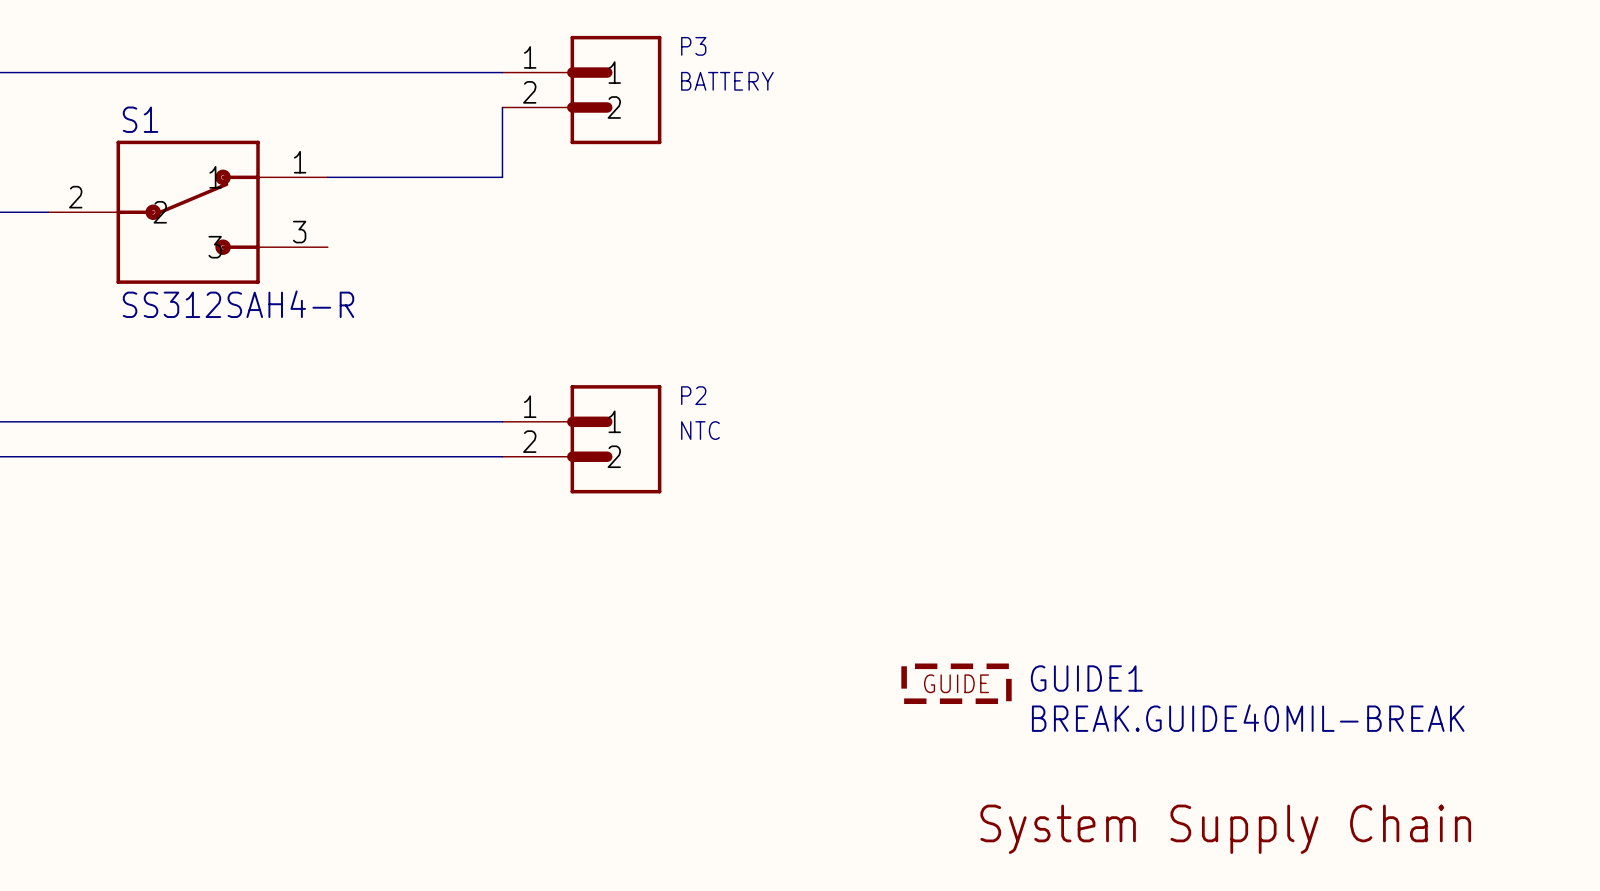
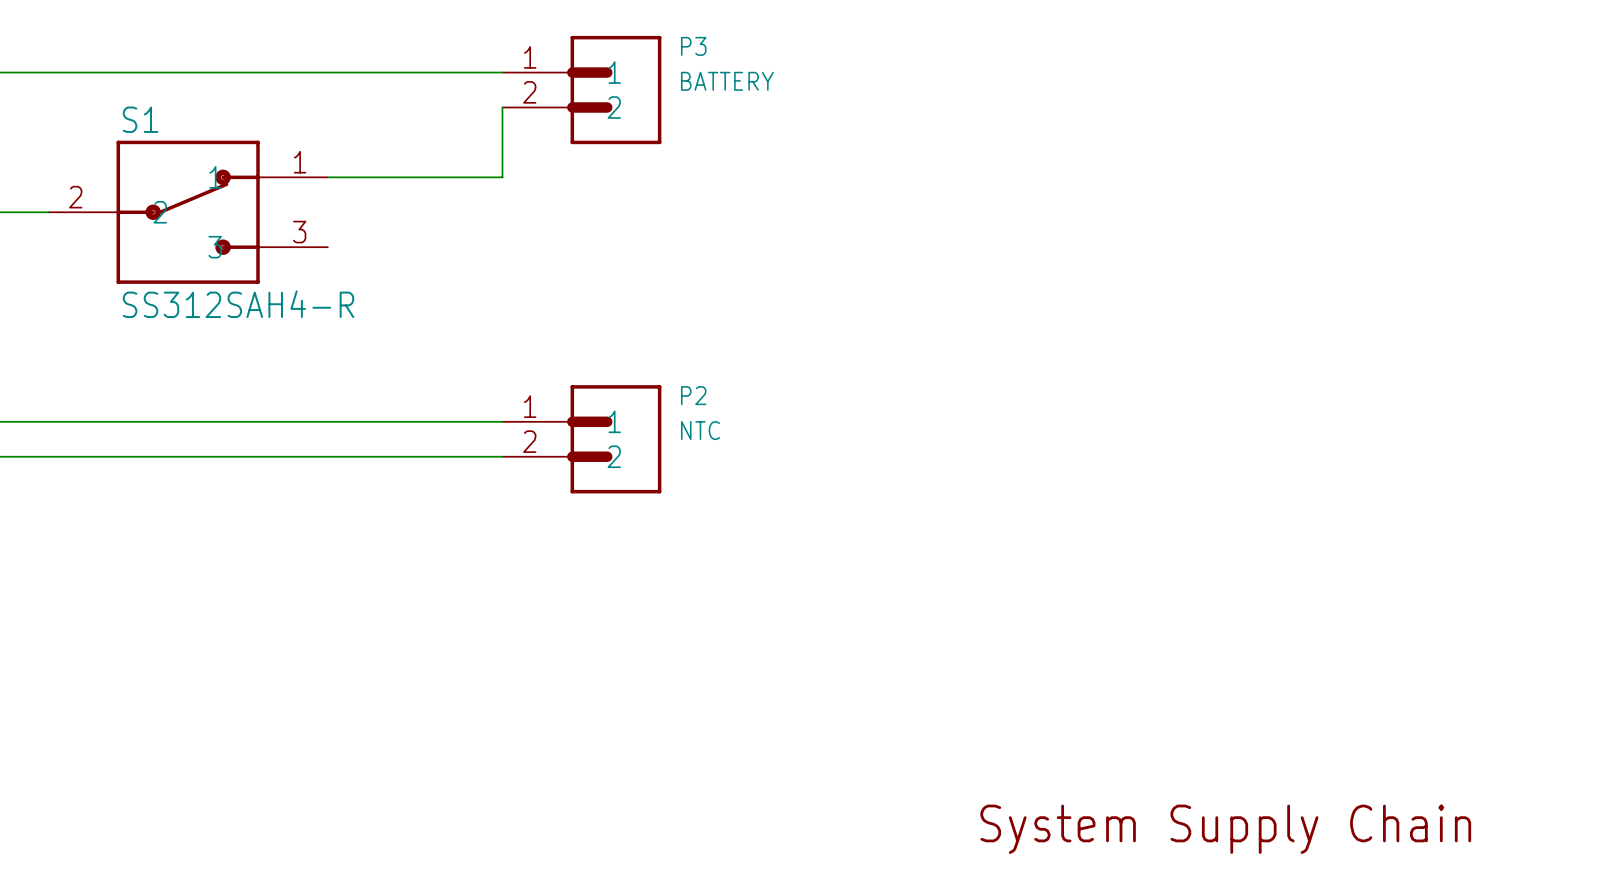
GUIDE1: BREAK.GUIDE40MIL-BREAK (956, 683) -> none

